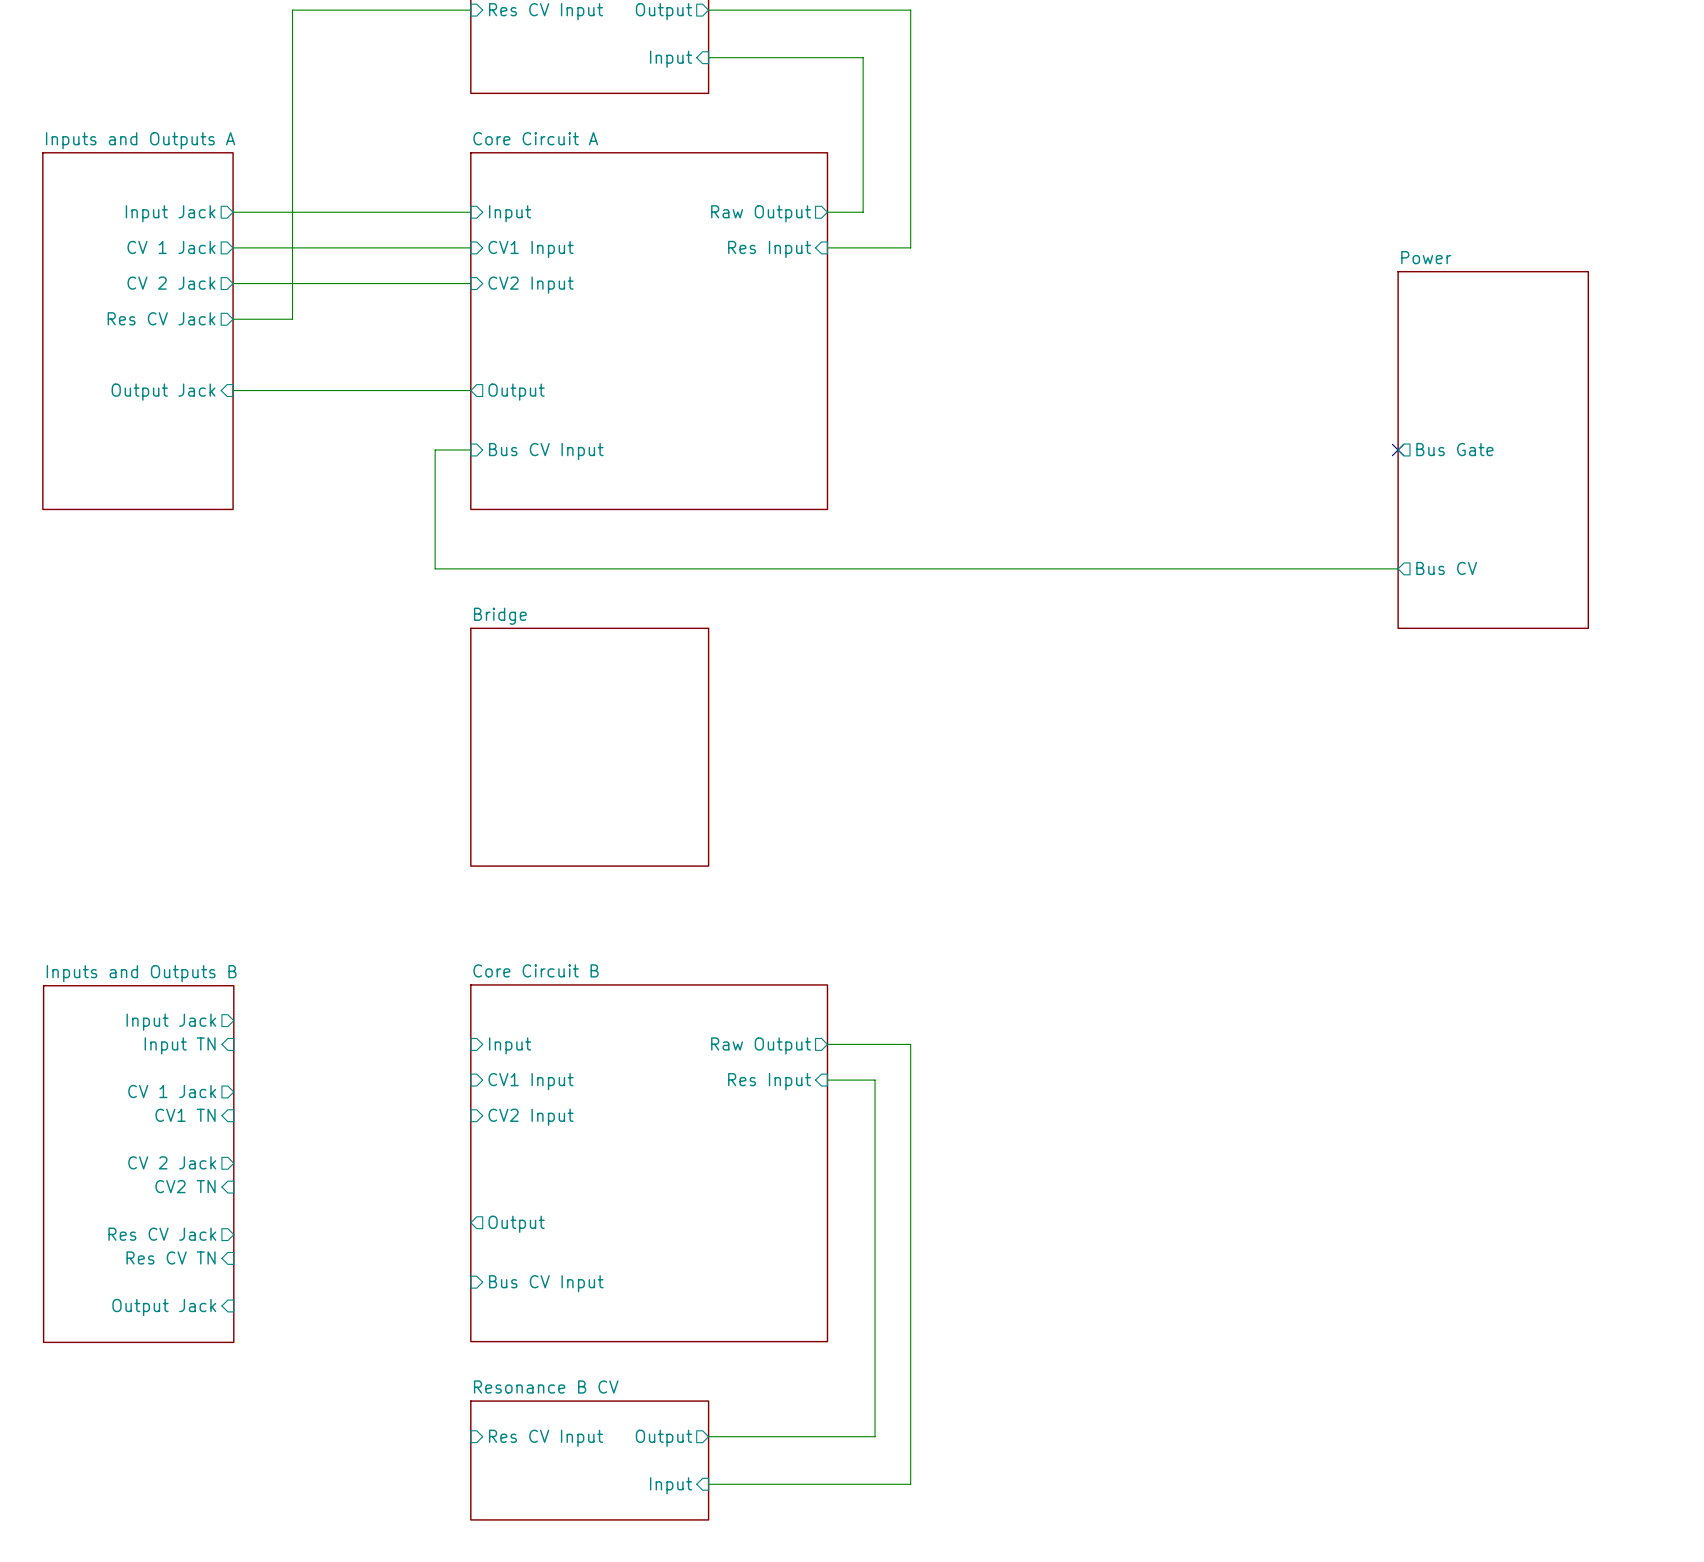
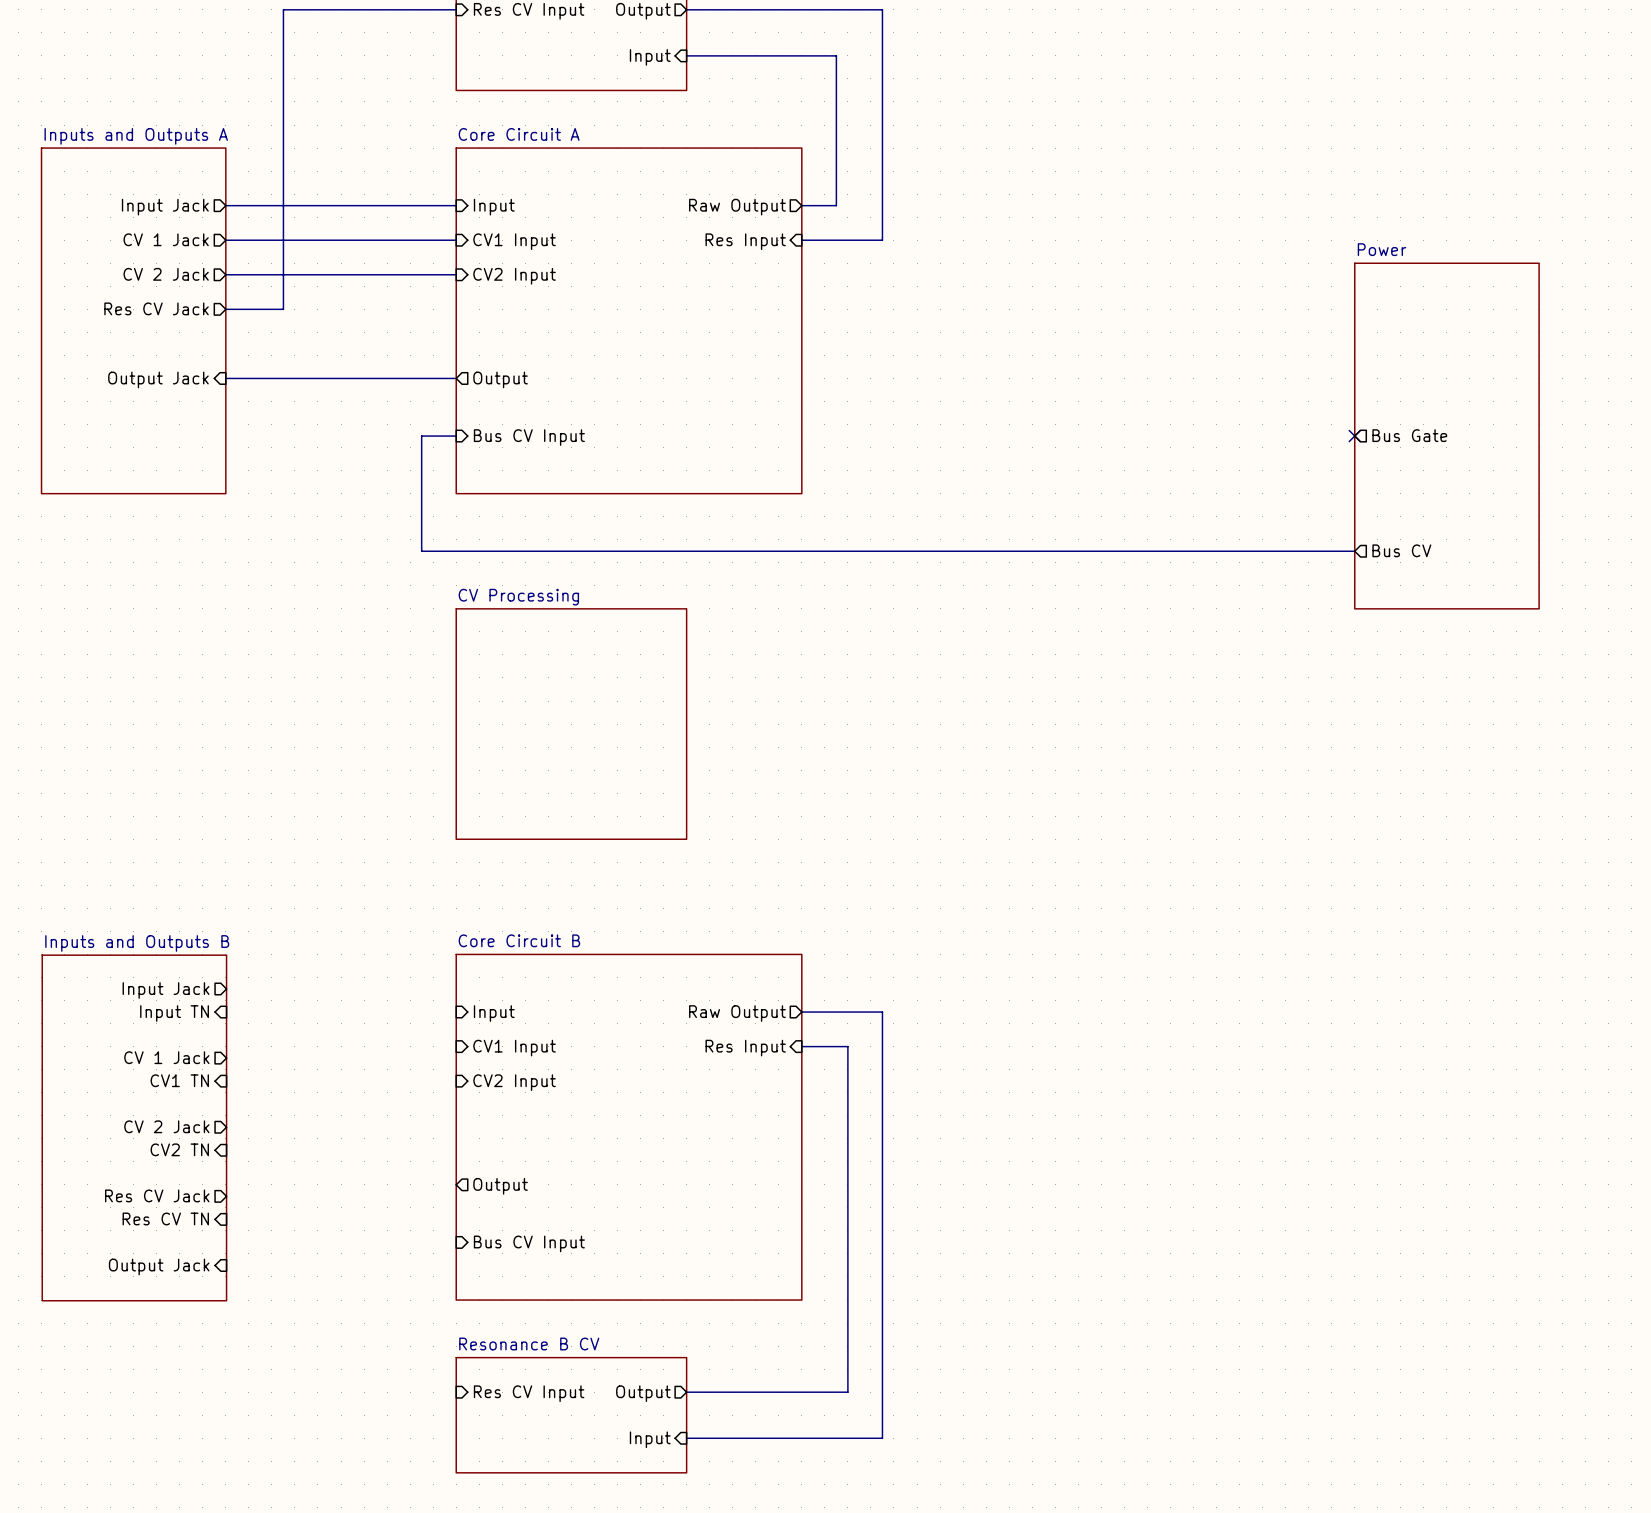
sheet Bridge name: Bridge (500, 616) -> CV Processing (518, 597)

